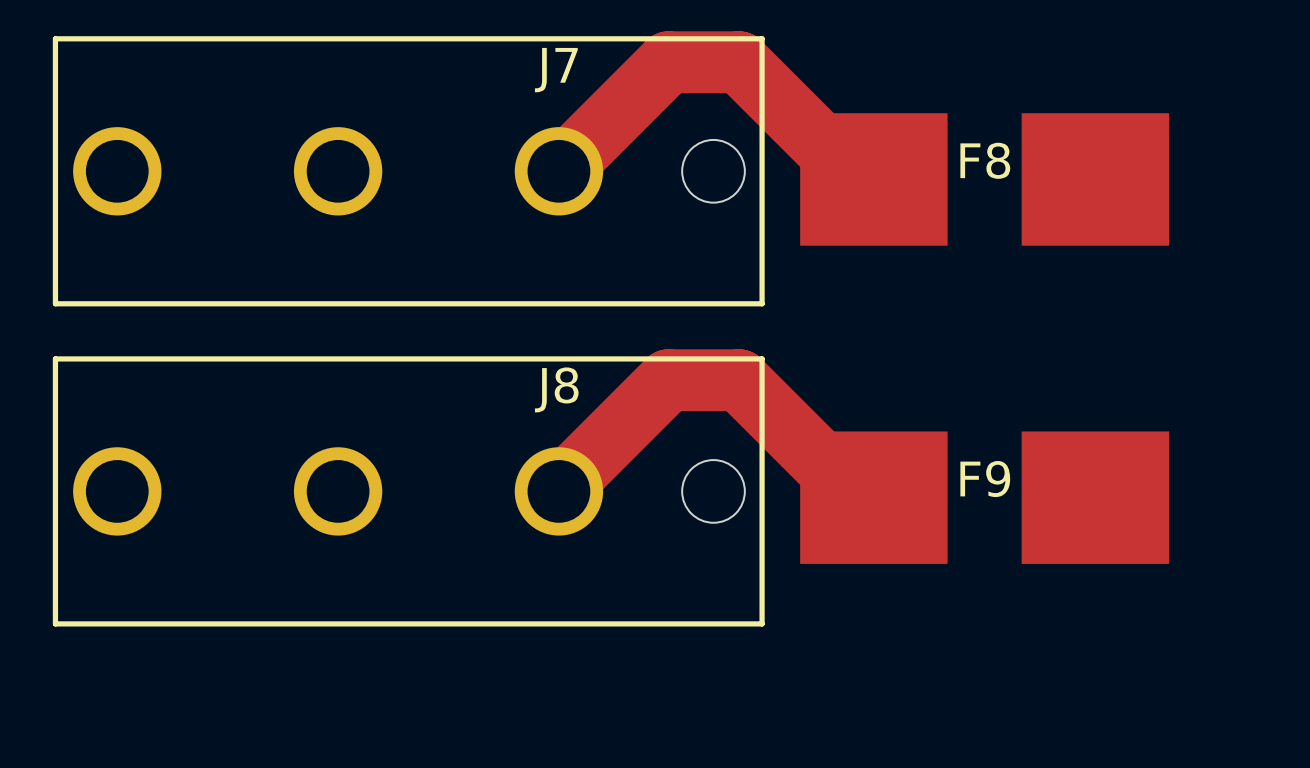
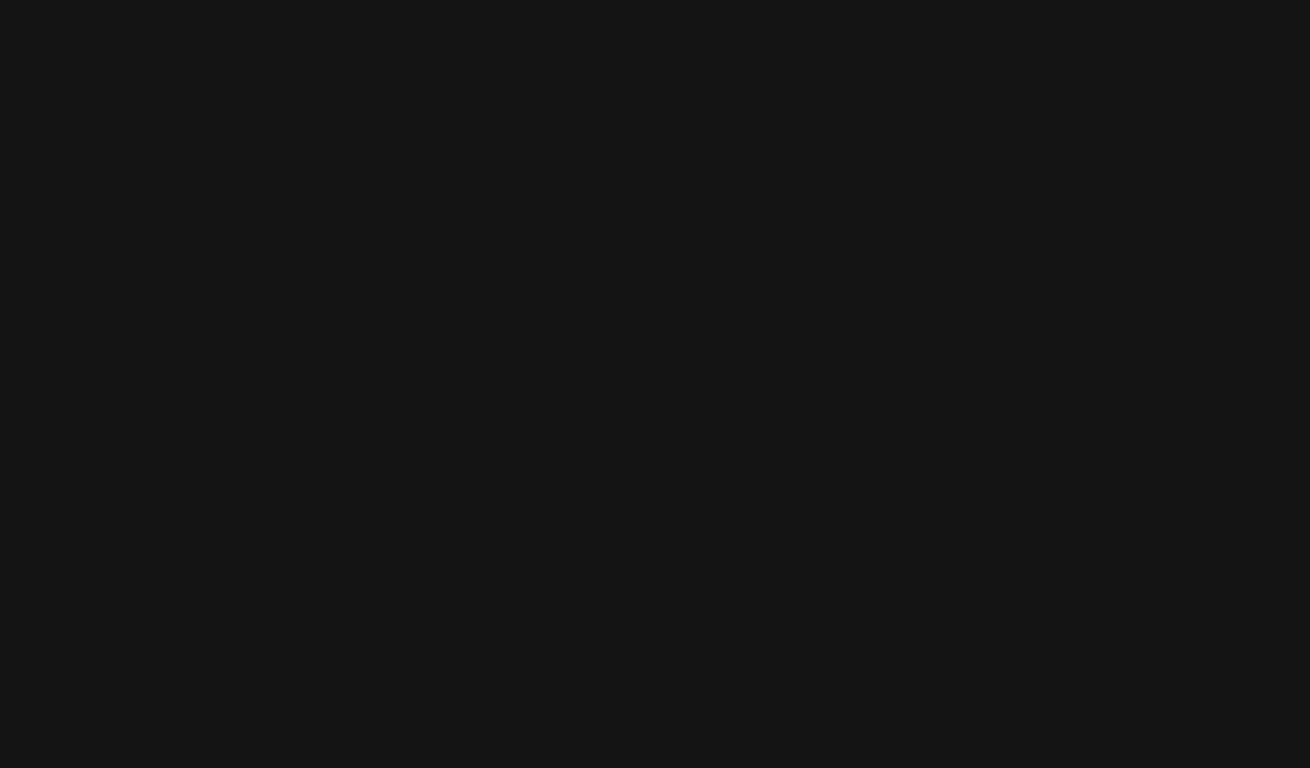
track: (559, 170) (668, 62) (739, 62) (867, 190) -> none
J7: (408, 171) -> none
F8: (984, 179) -> none
track: (559, 488) (668, 380) (739, 380) (867, 508) -> none
J8: (408, 491) -> none
F9: (984, 497) -> none

